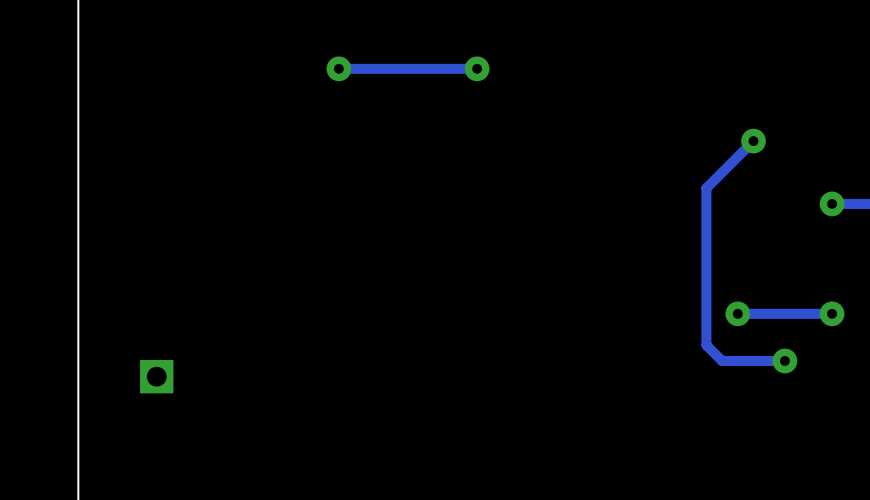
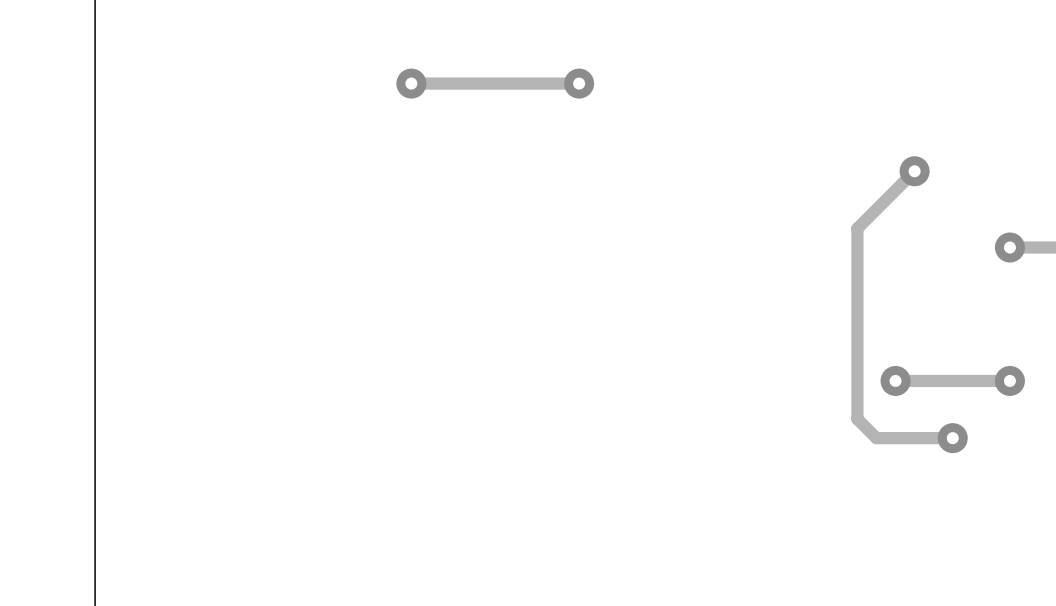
part: (156, 376) -> none

